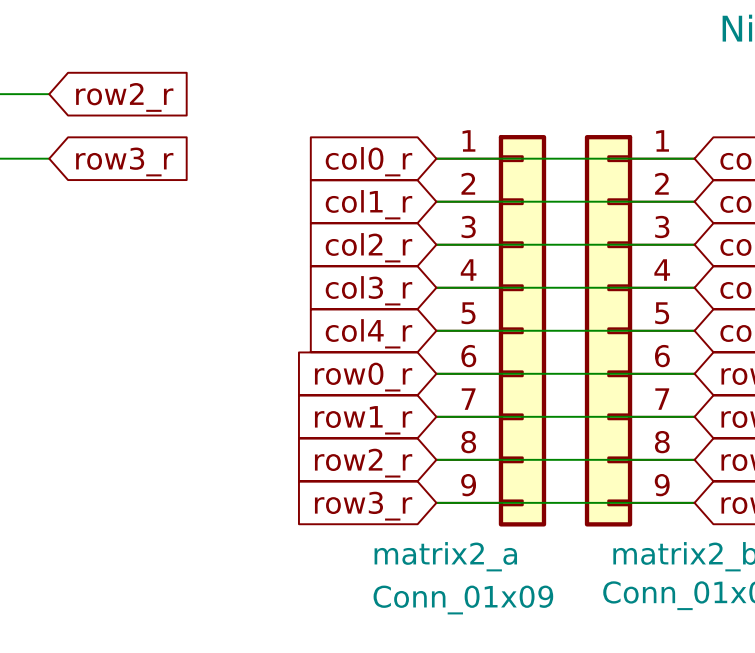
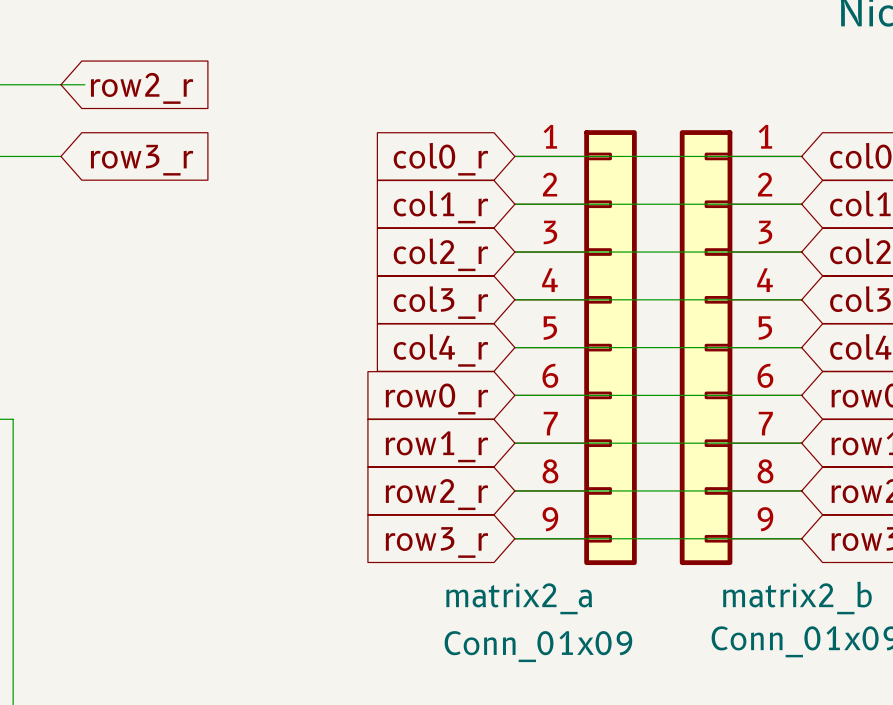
global label position: row2_r (124, 97) -> row2_r (142, 88)
wire: (27, 158) (49, 158) -> none
global label position: row3_r (124, 161) -> row3_r (142, 160)

